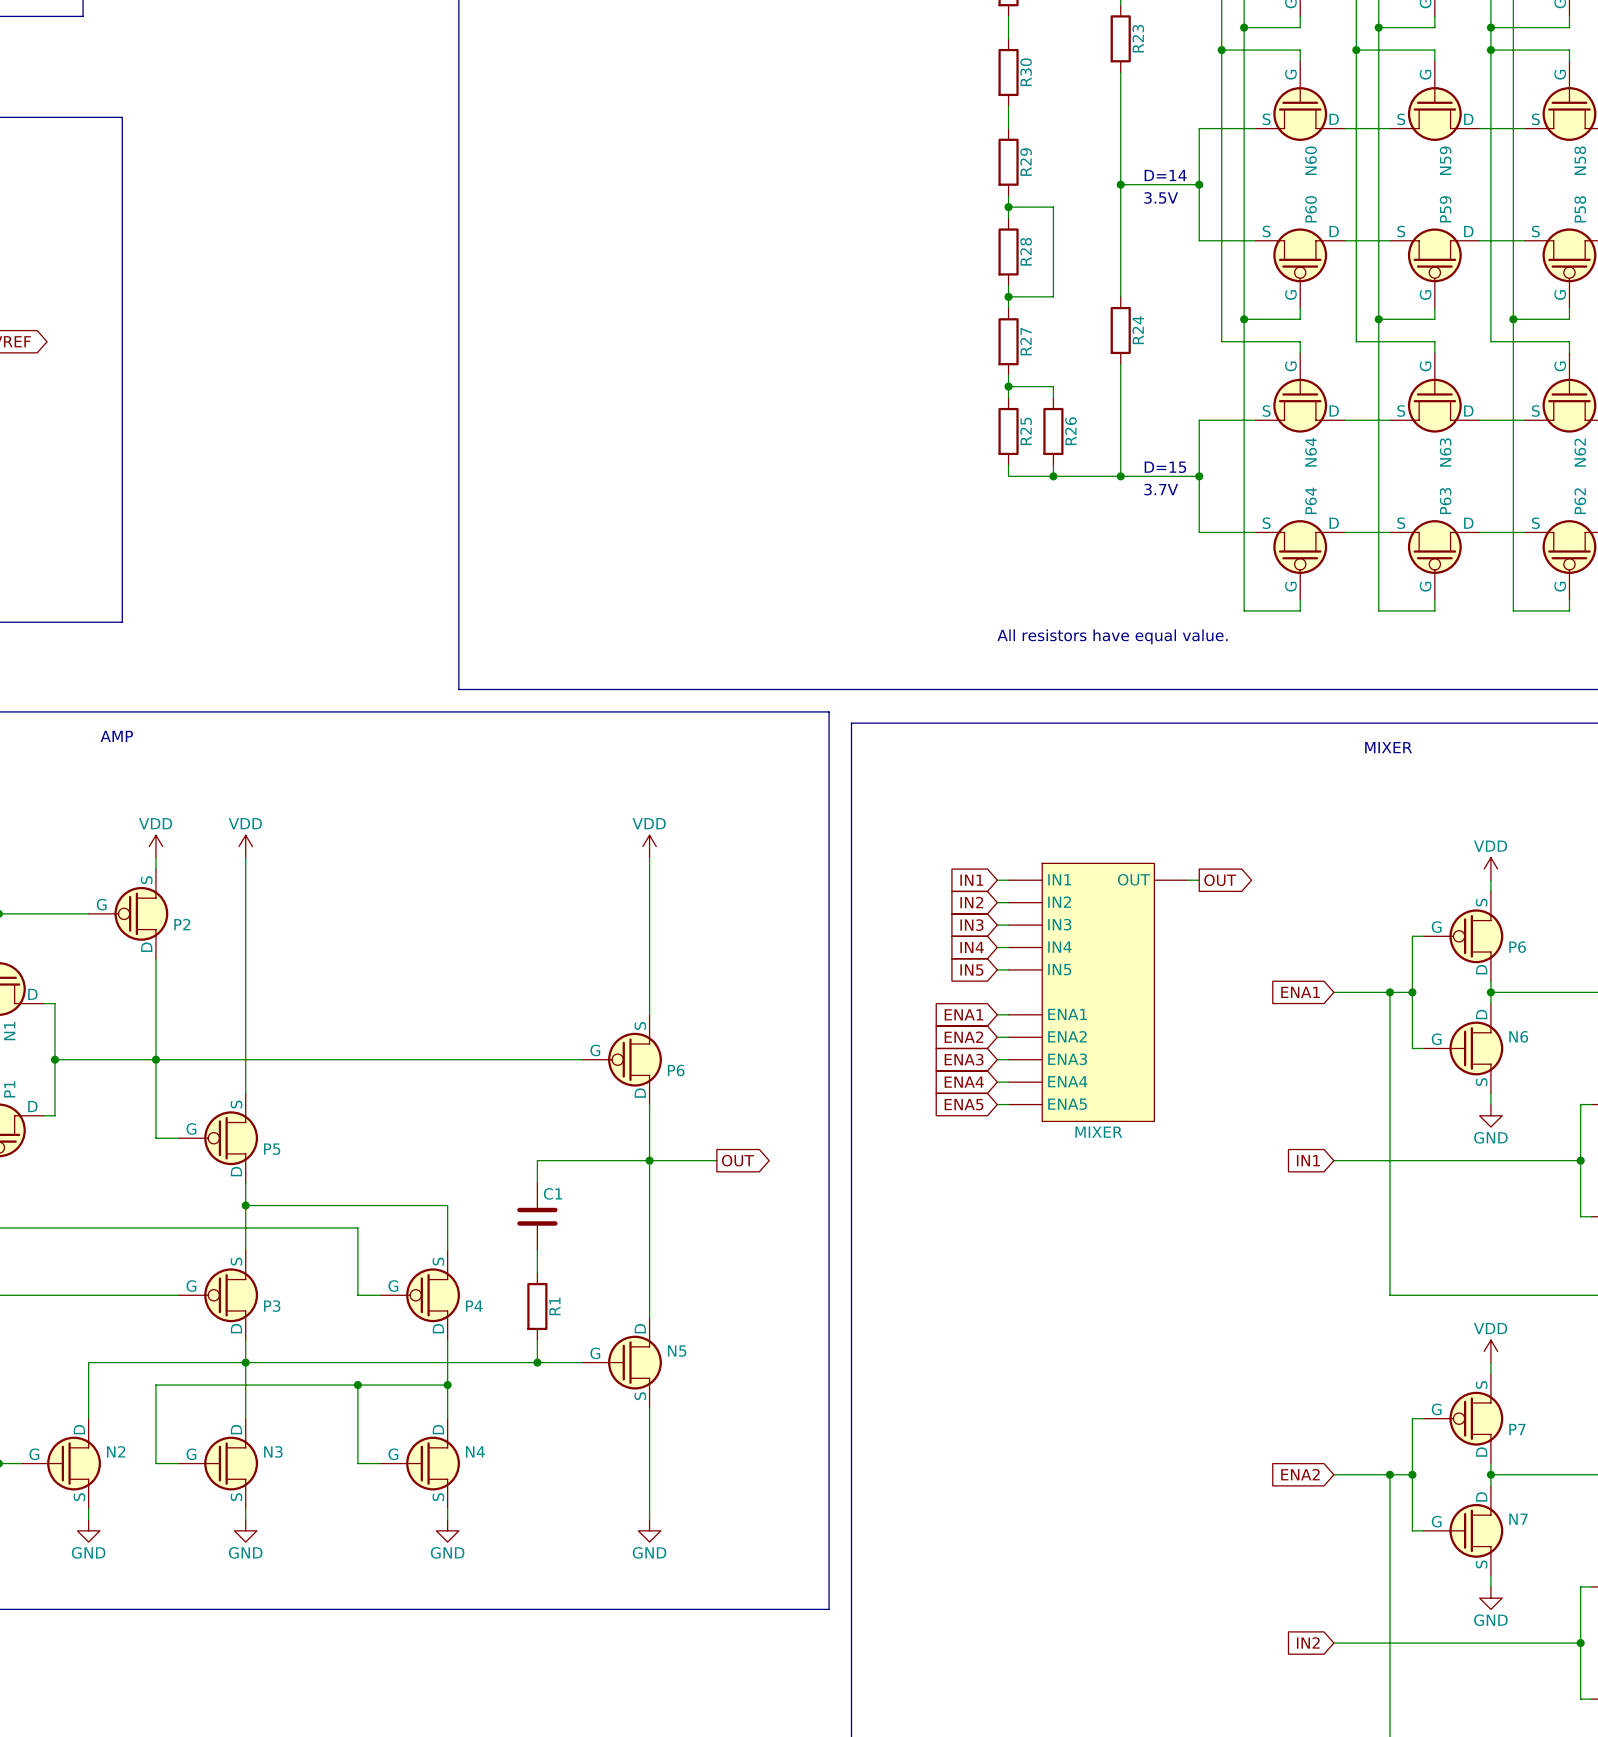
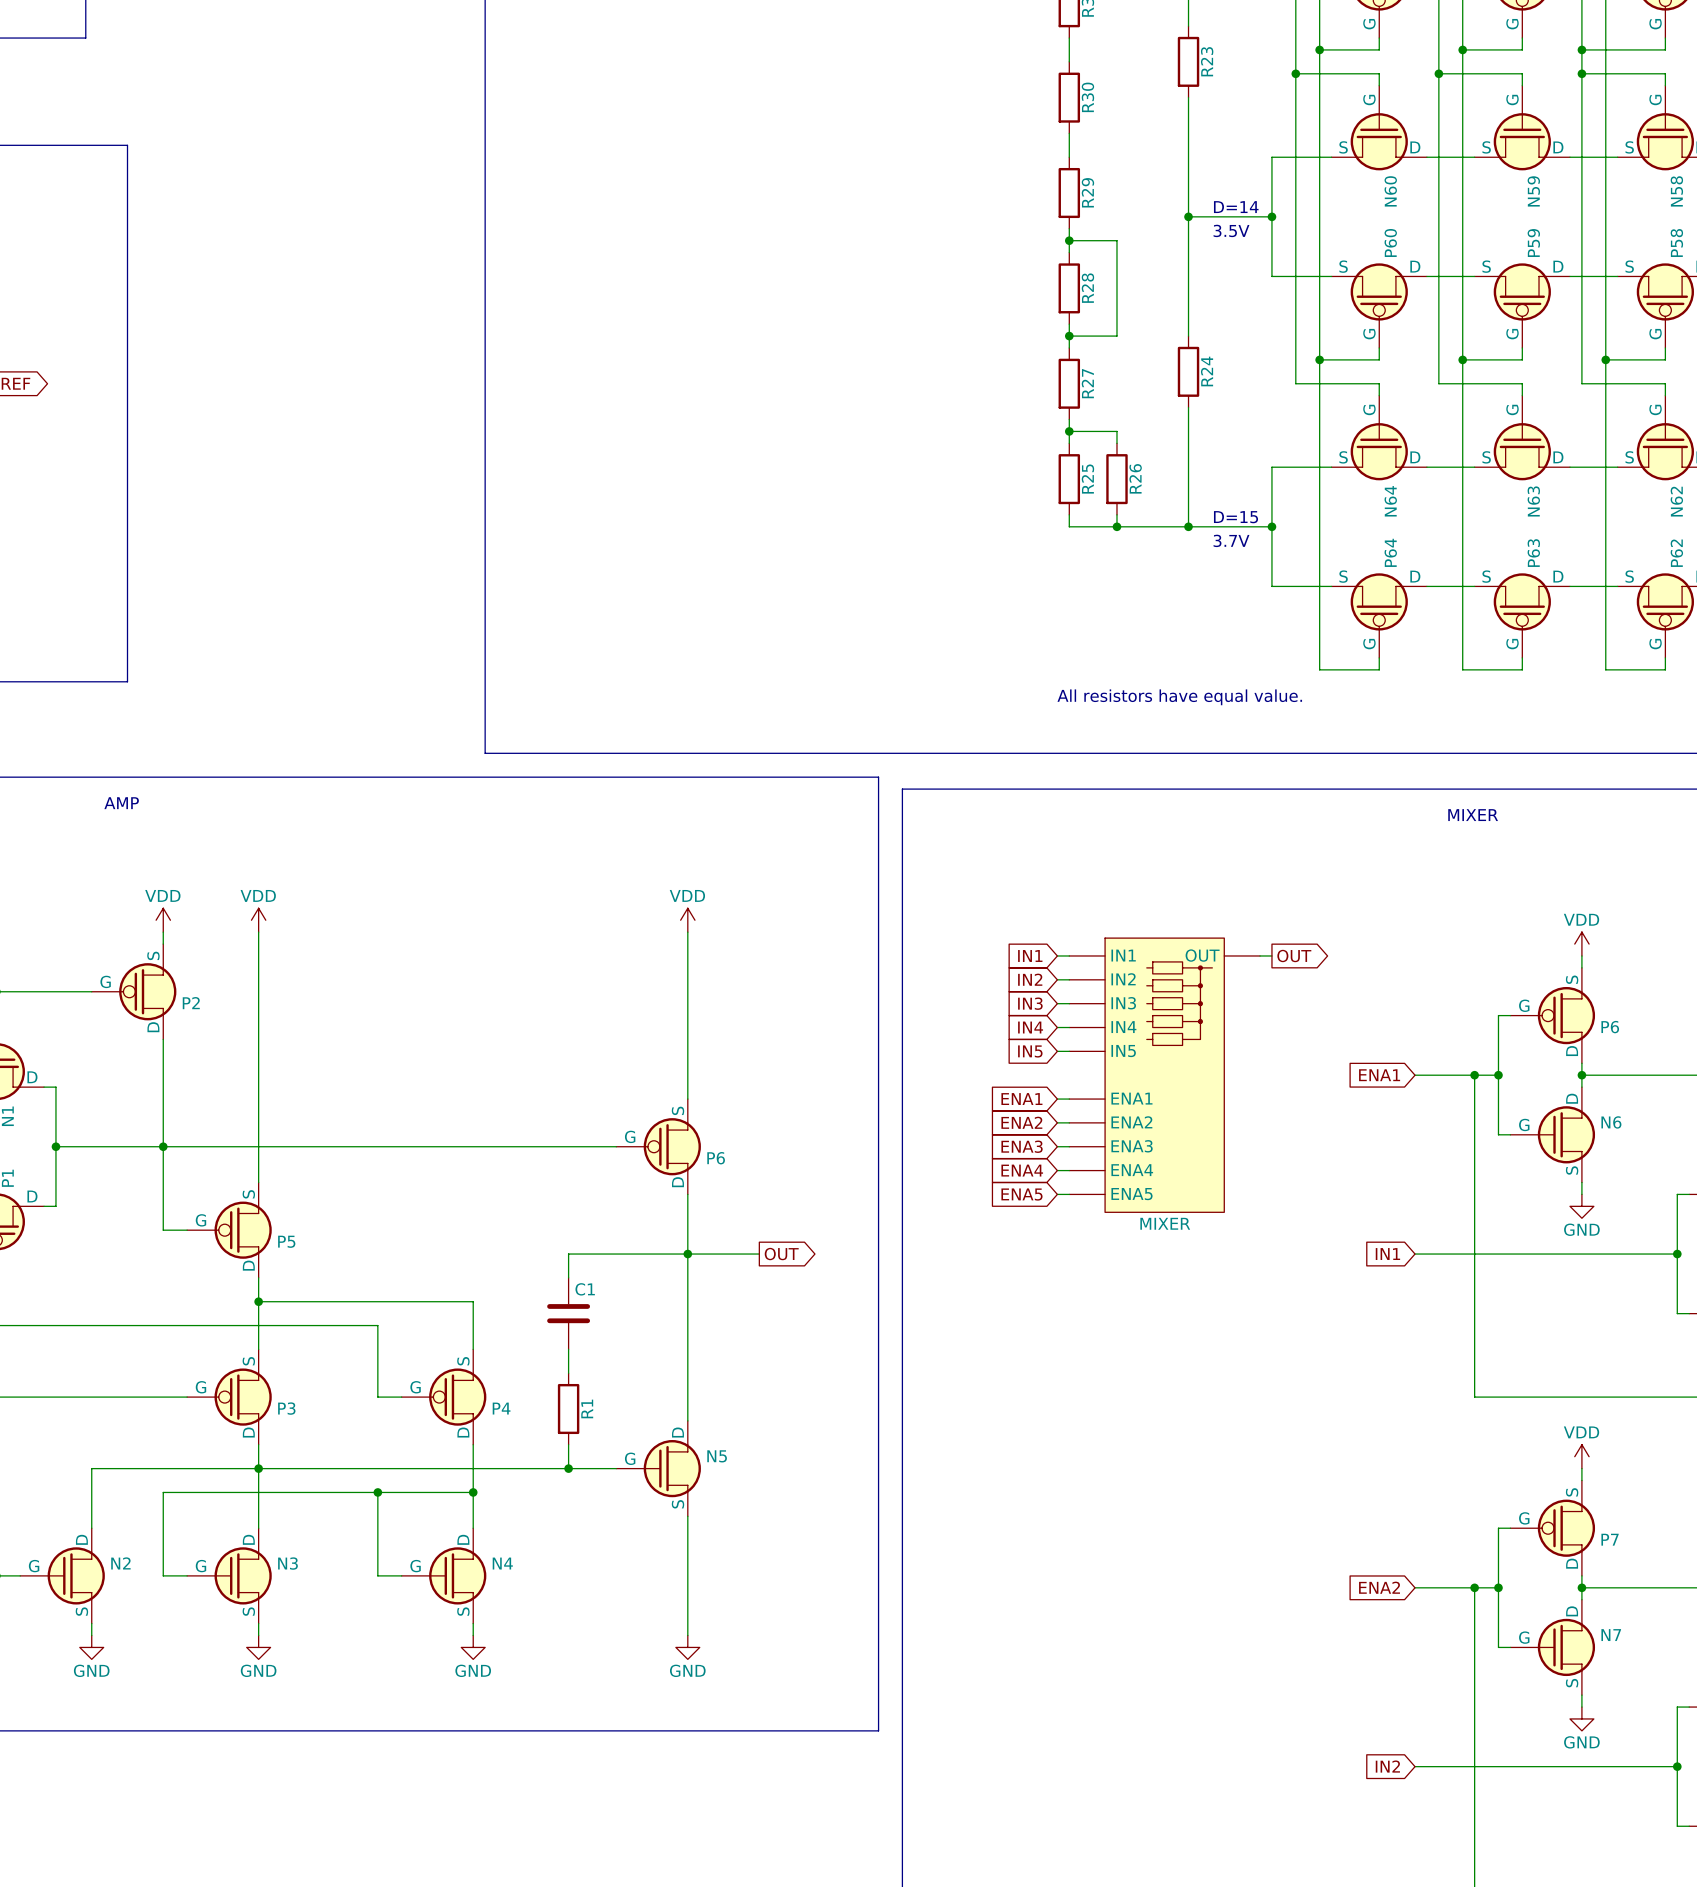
part symbol: [1008, 863, 1189, 1122] -> [1069, 938, 1261, 1213]

